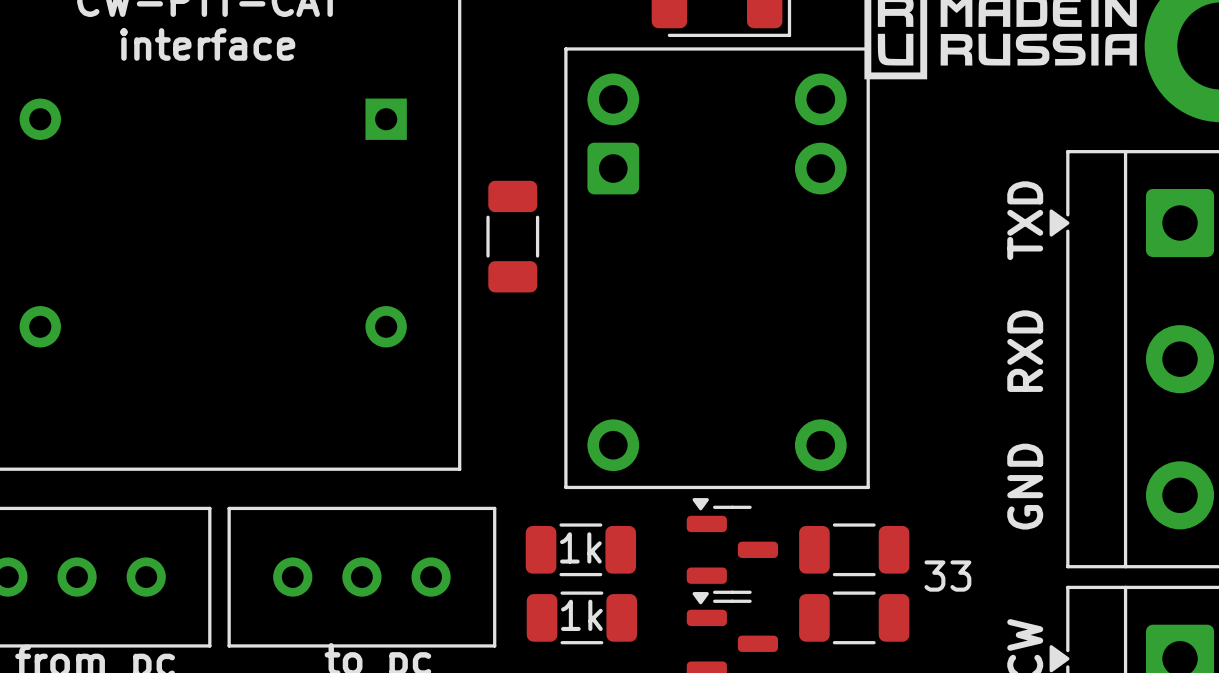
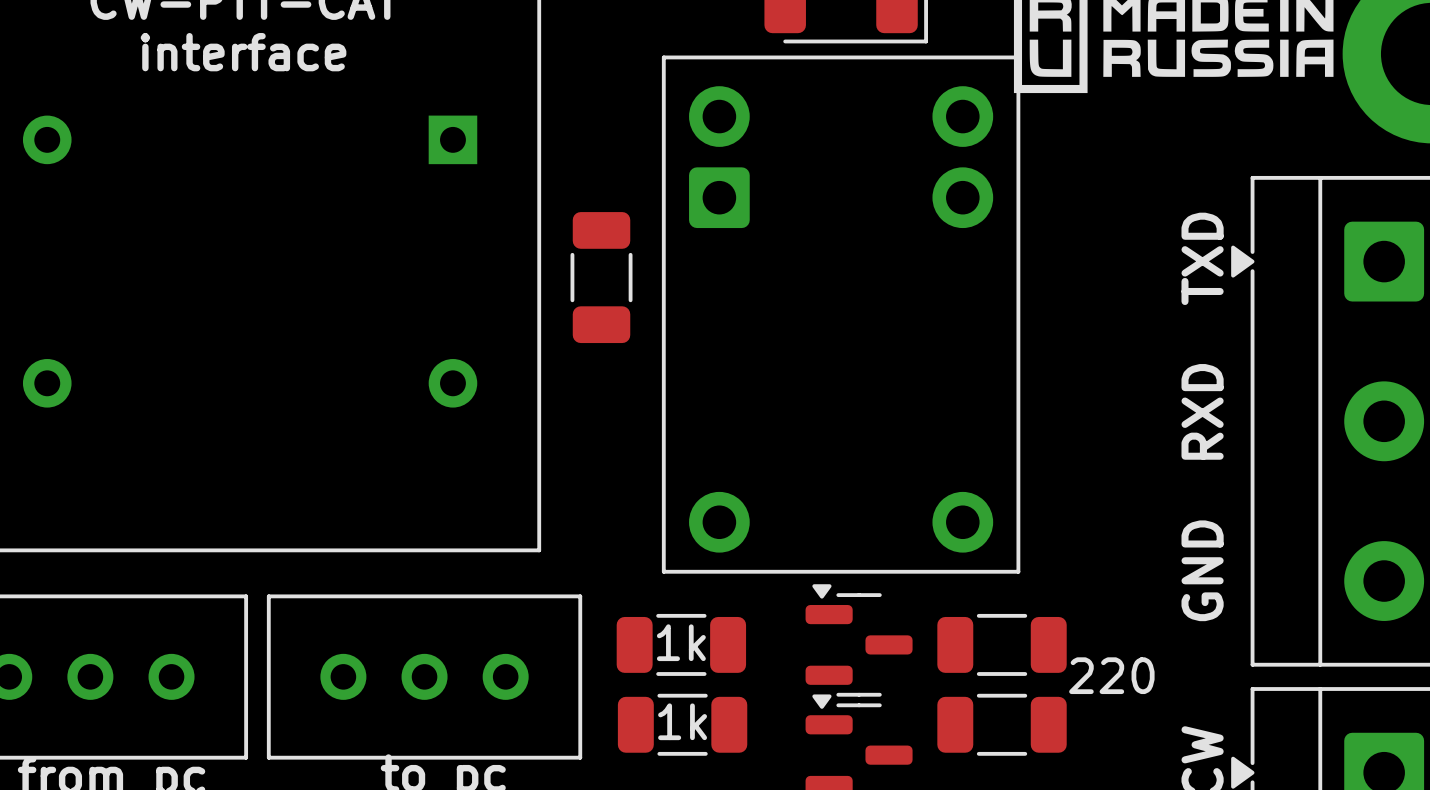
part value: 33 (947, 576) -> 220 (1111, 675)

